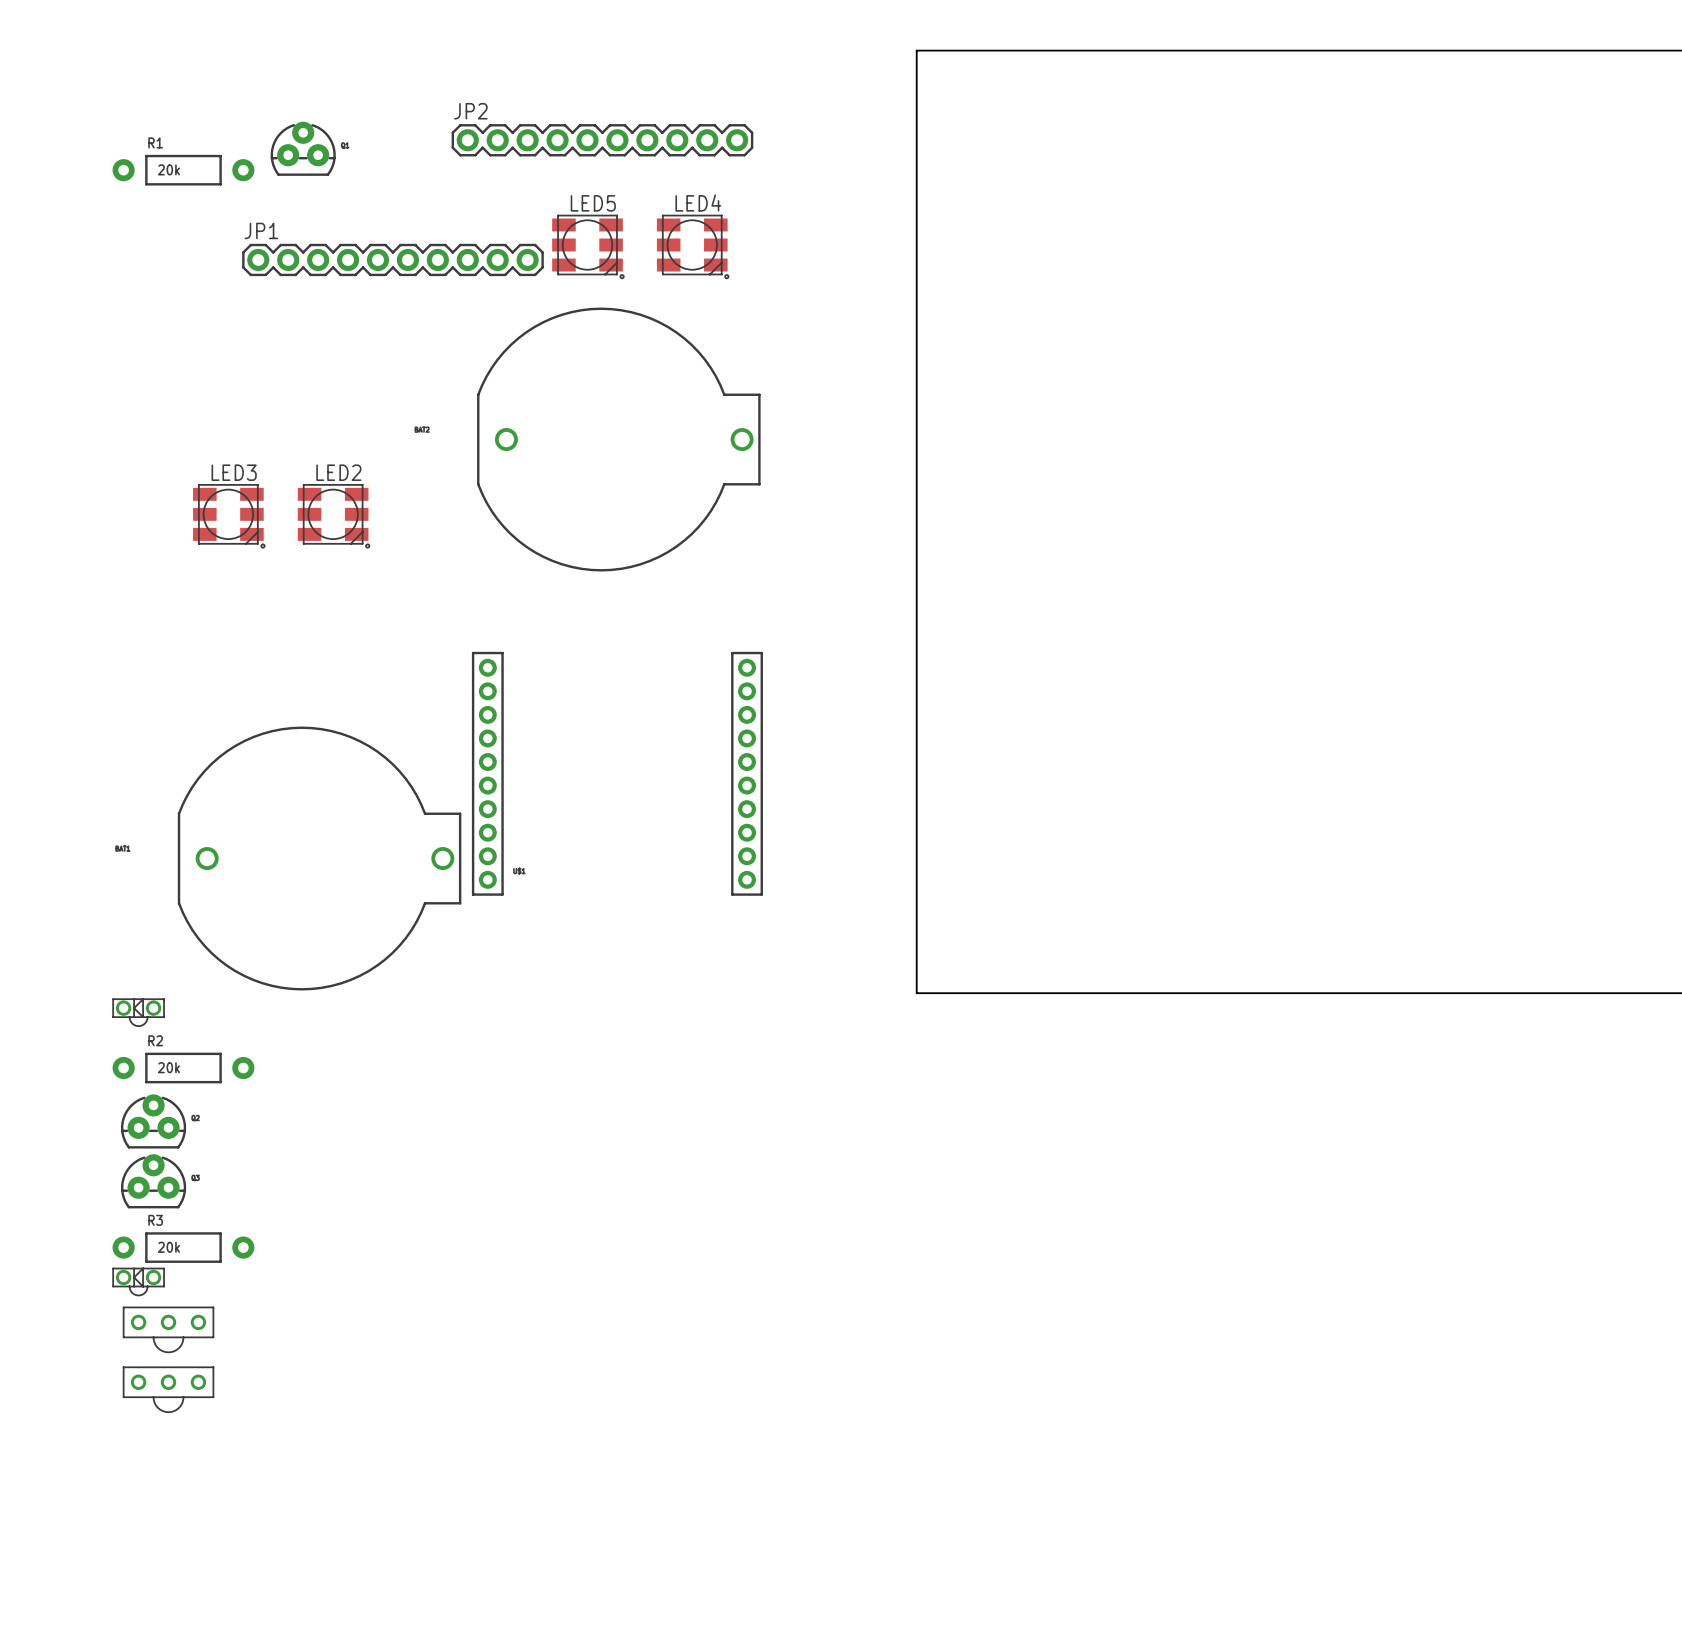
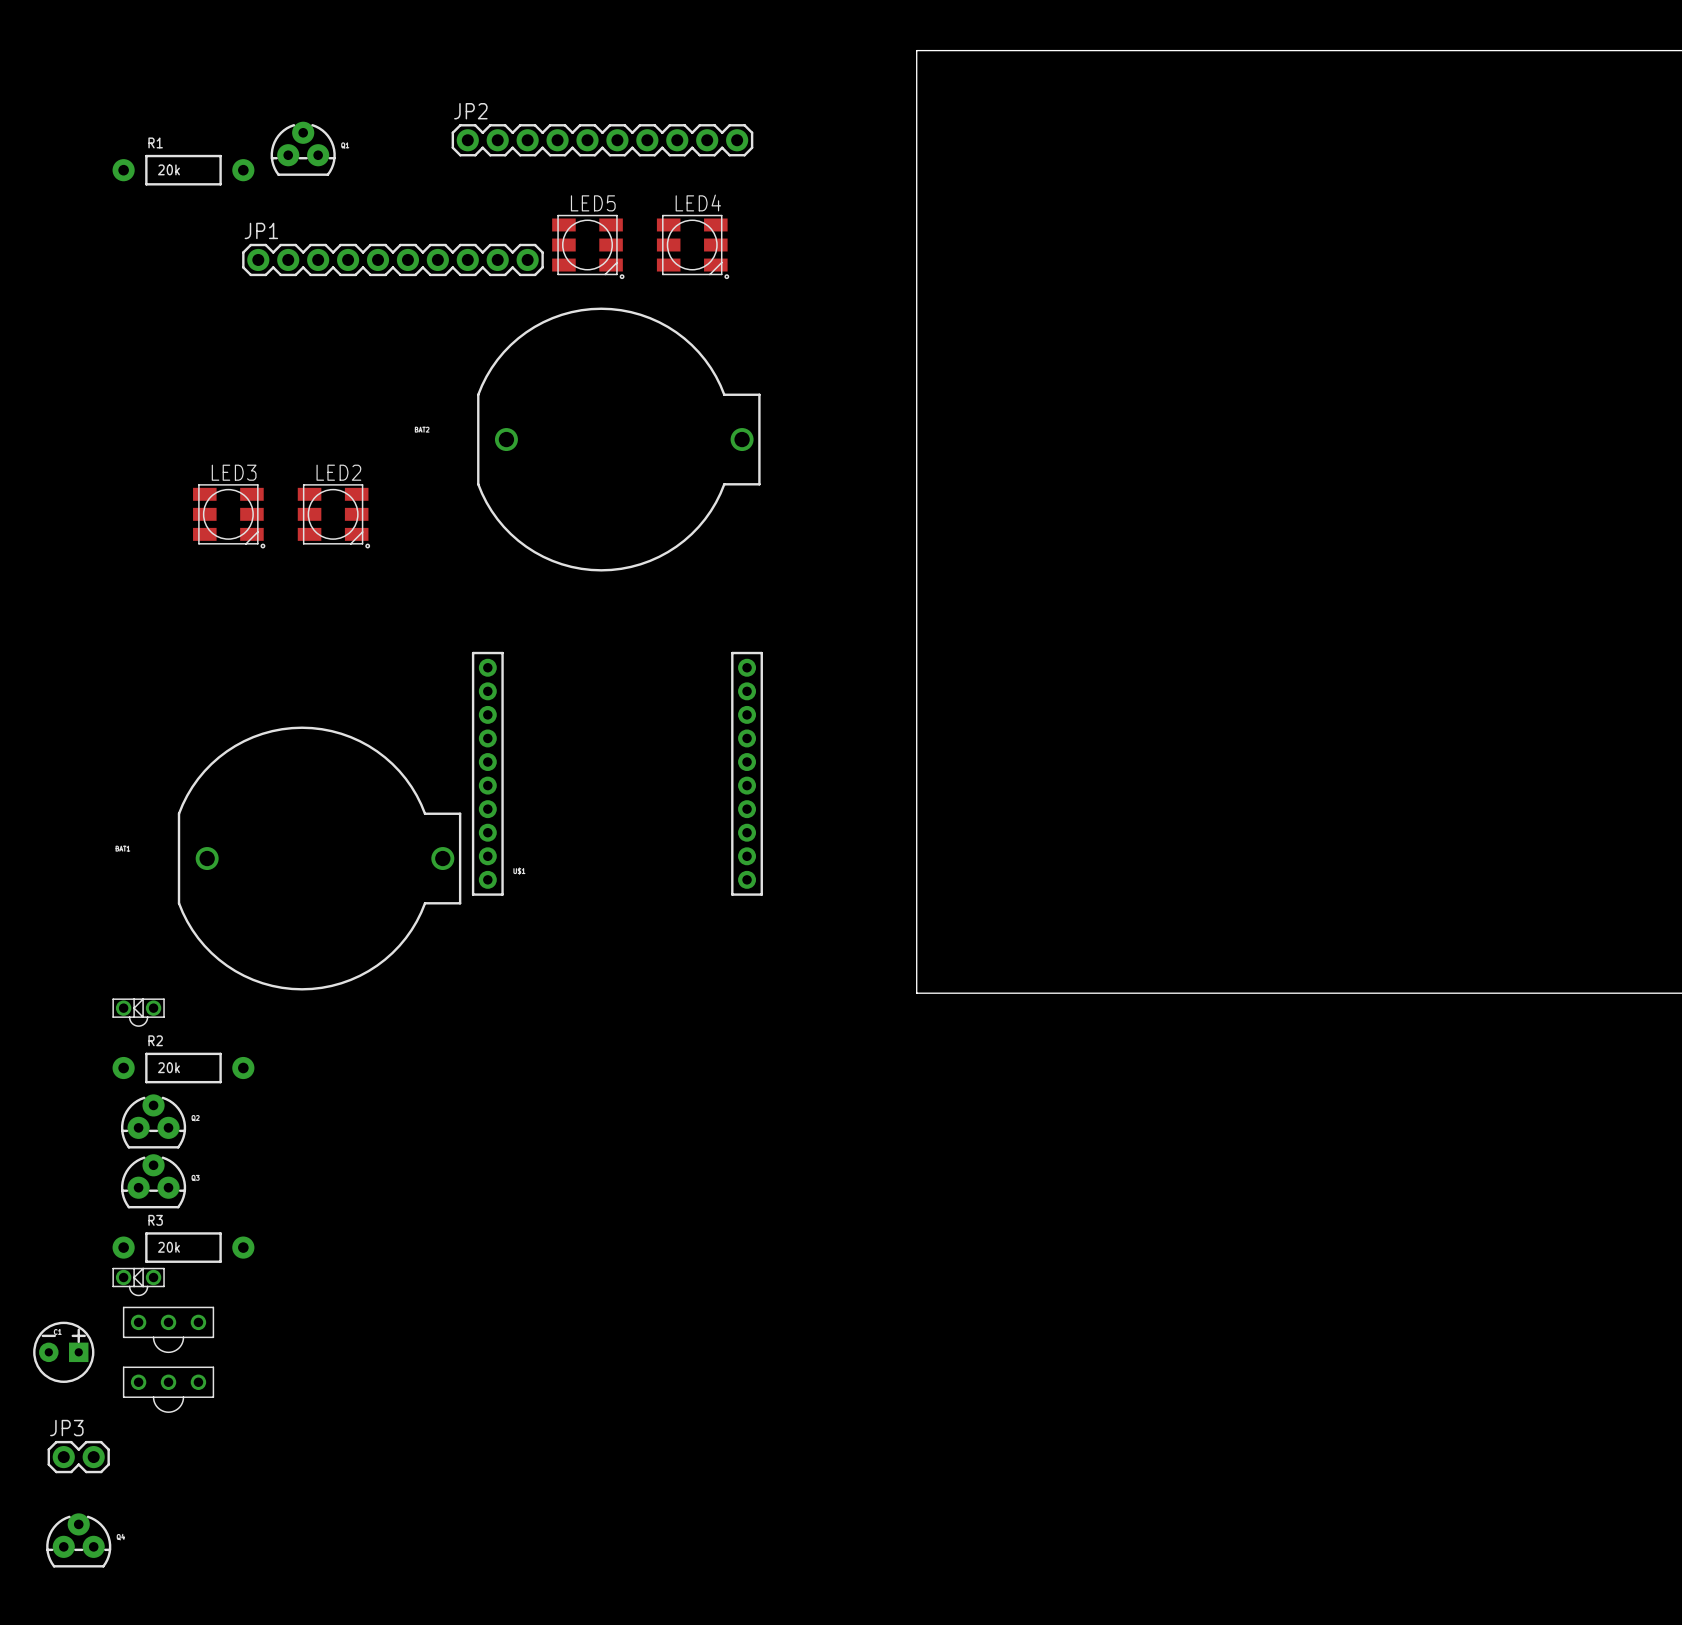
part: none -> (63, 1352)
JP3: none -> (78, 1457)
part: none -> (78, 1540)

